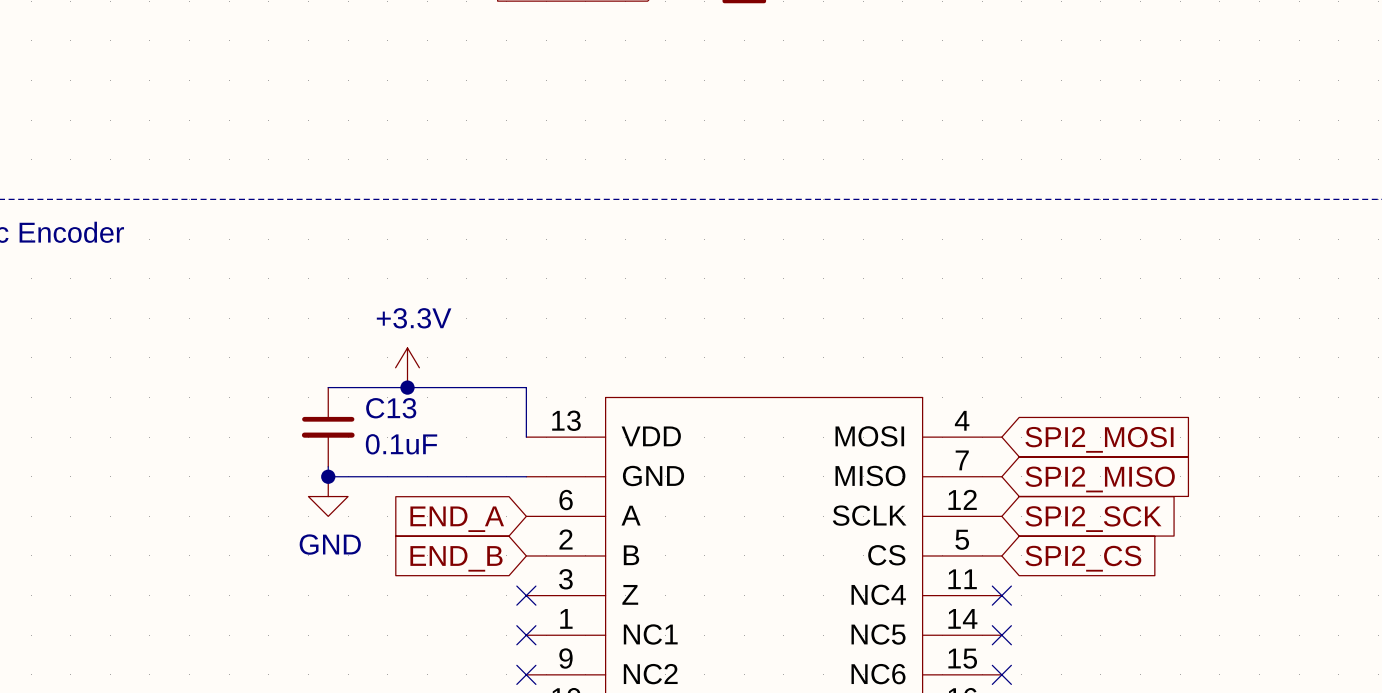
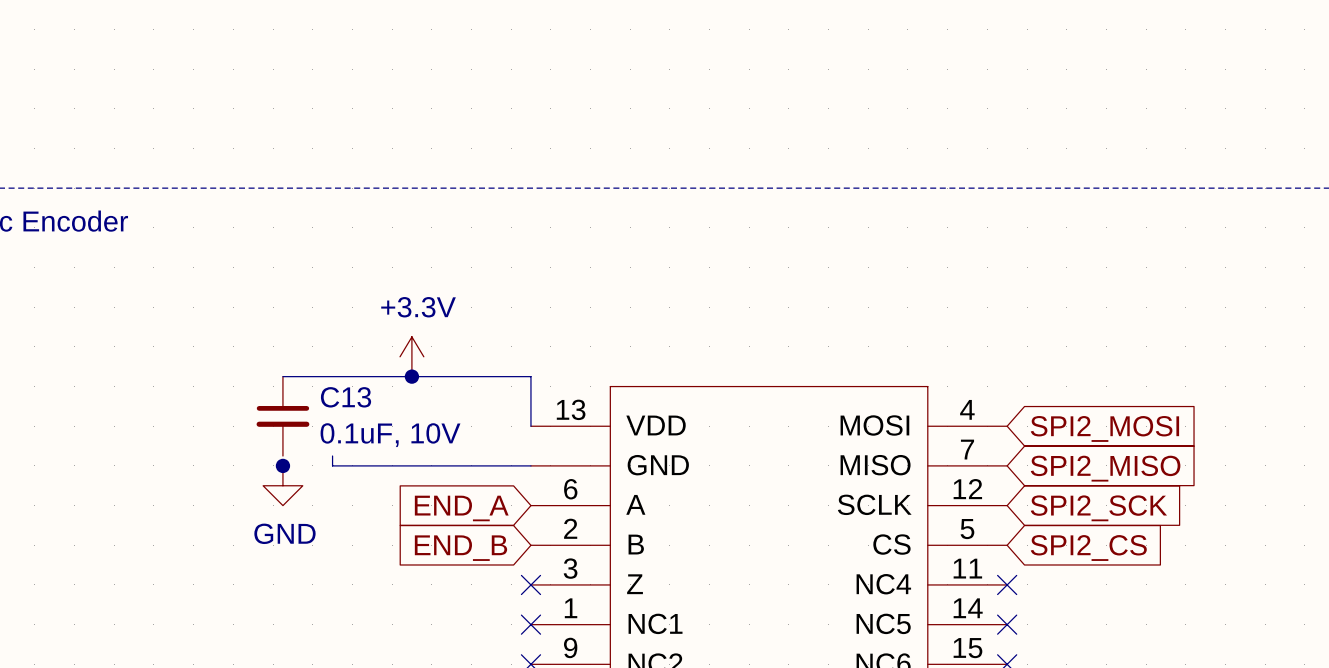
wire: none -> (282, 376) (332, 376)
C13 position: (328, 427) -> (282, 416)
C13 value: 0.1uF (401, 444) -> 0.1uF, 10V (390, 435)
junction position: (328, 476) -> (282, 465)
power symbol position: GND (328, 496) -> GND (282, 485)

